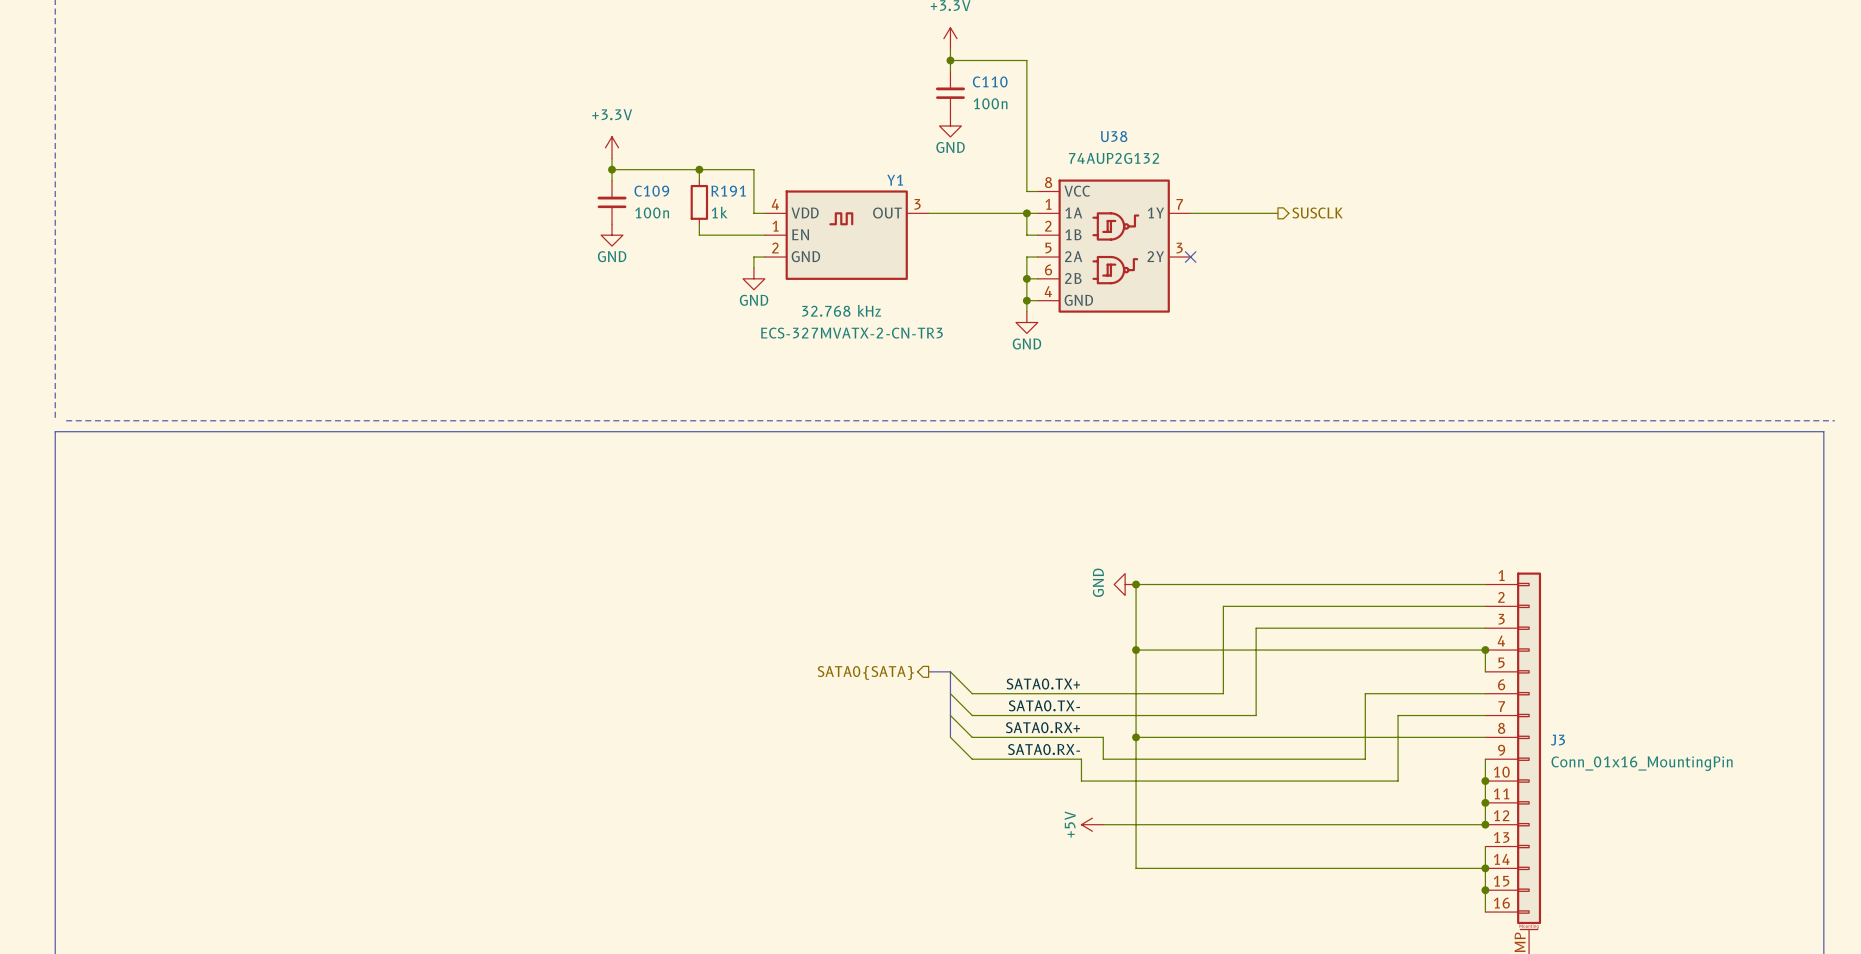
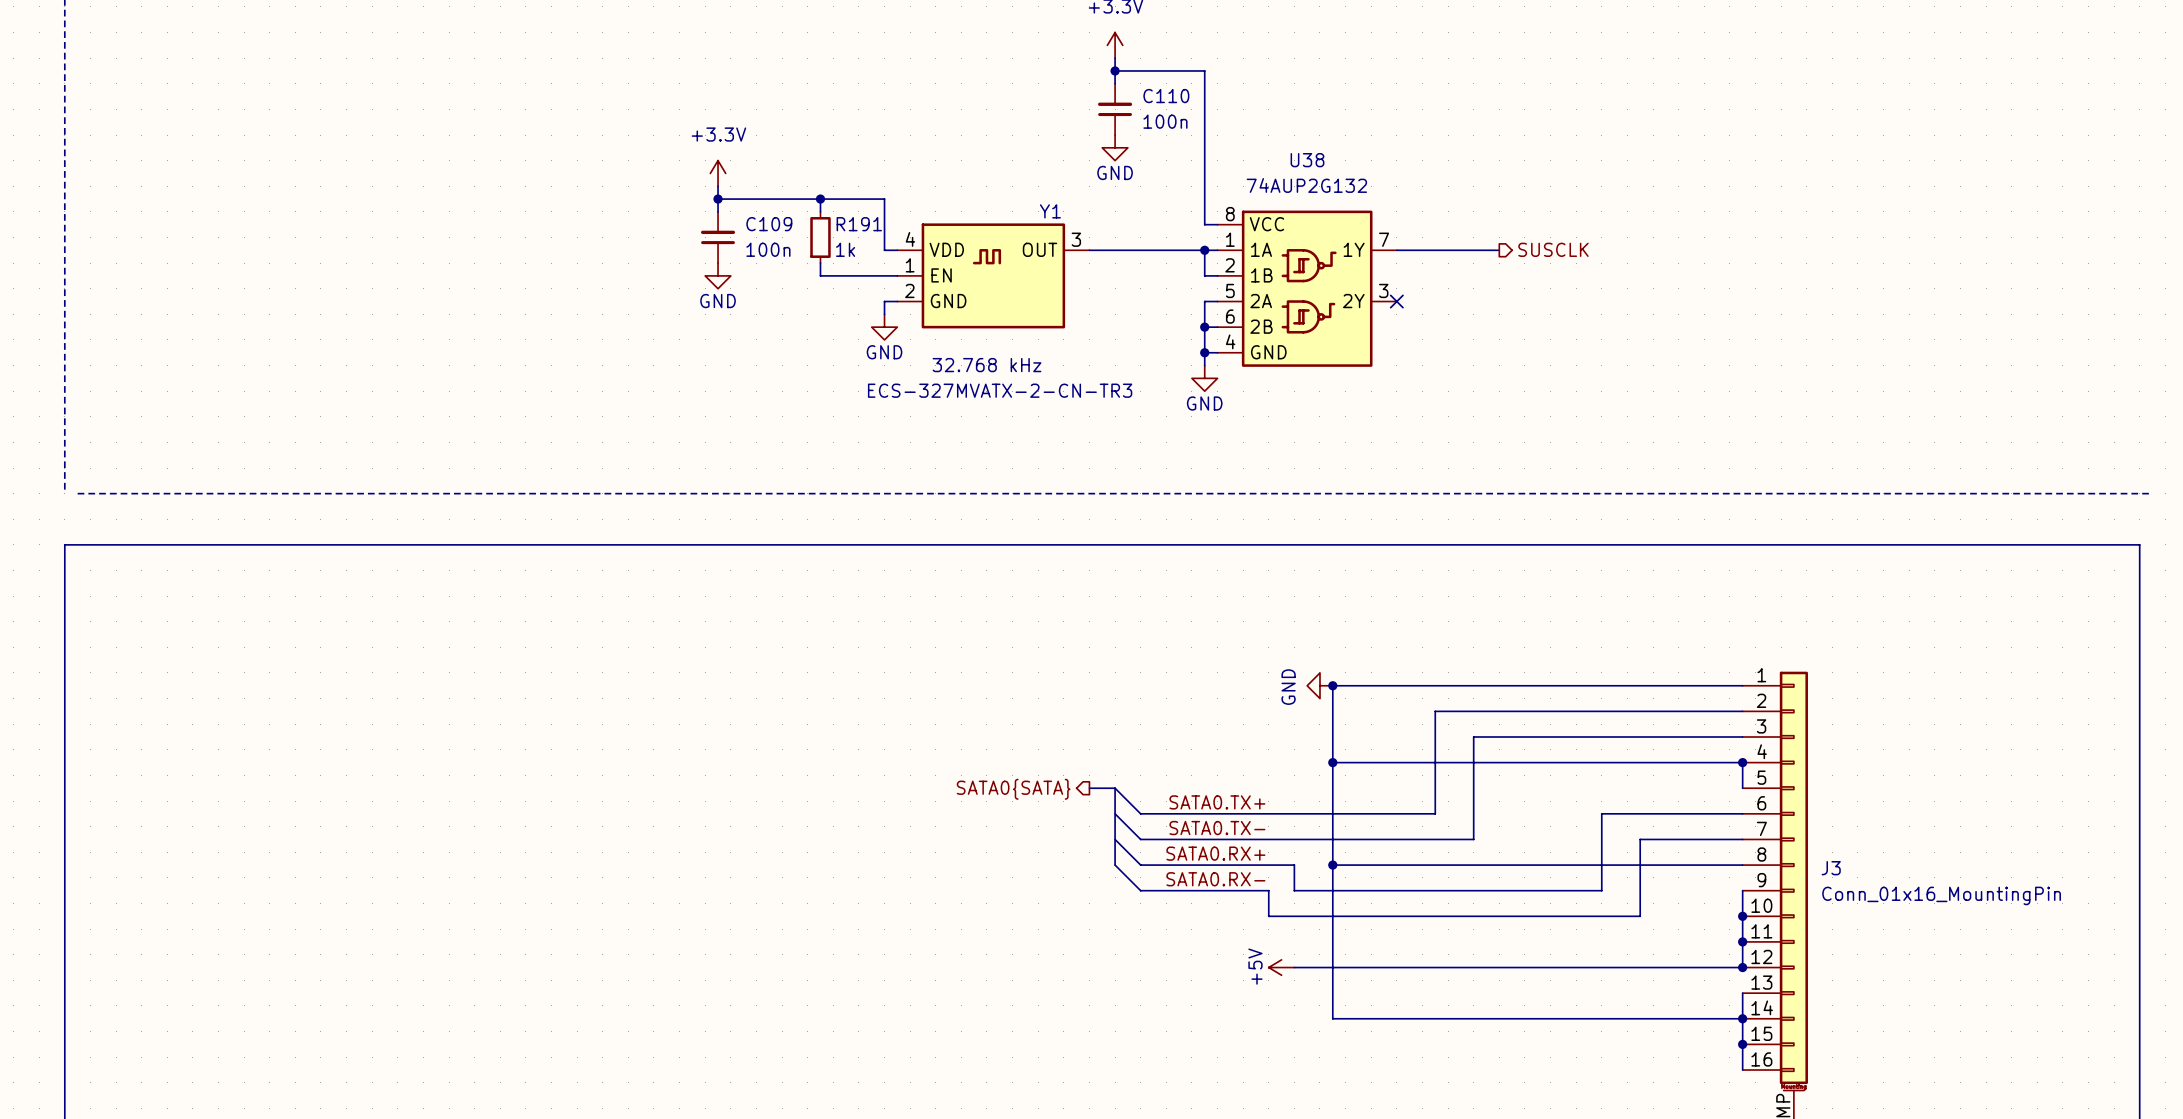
line: (55, 464) (55, 431) (1823, 431) (1823, 464) -> (64, 544) (2139, 544)

